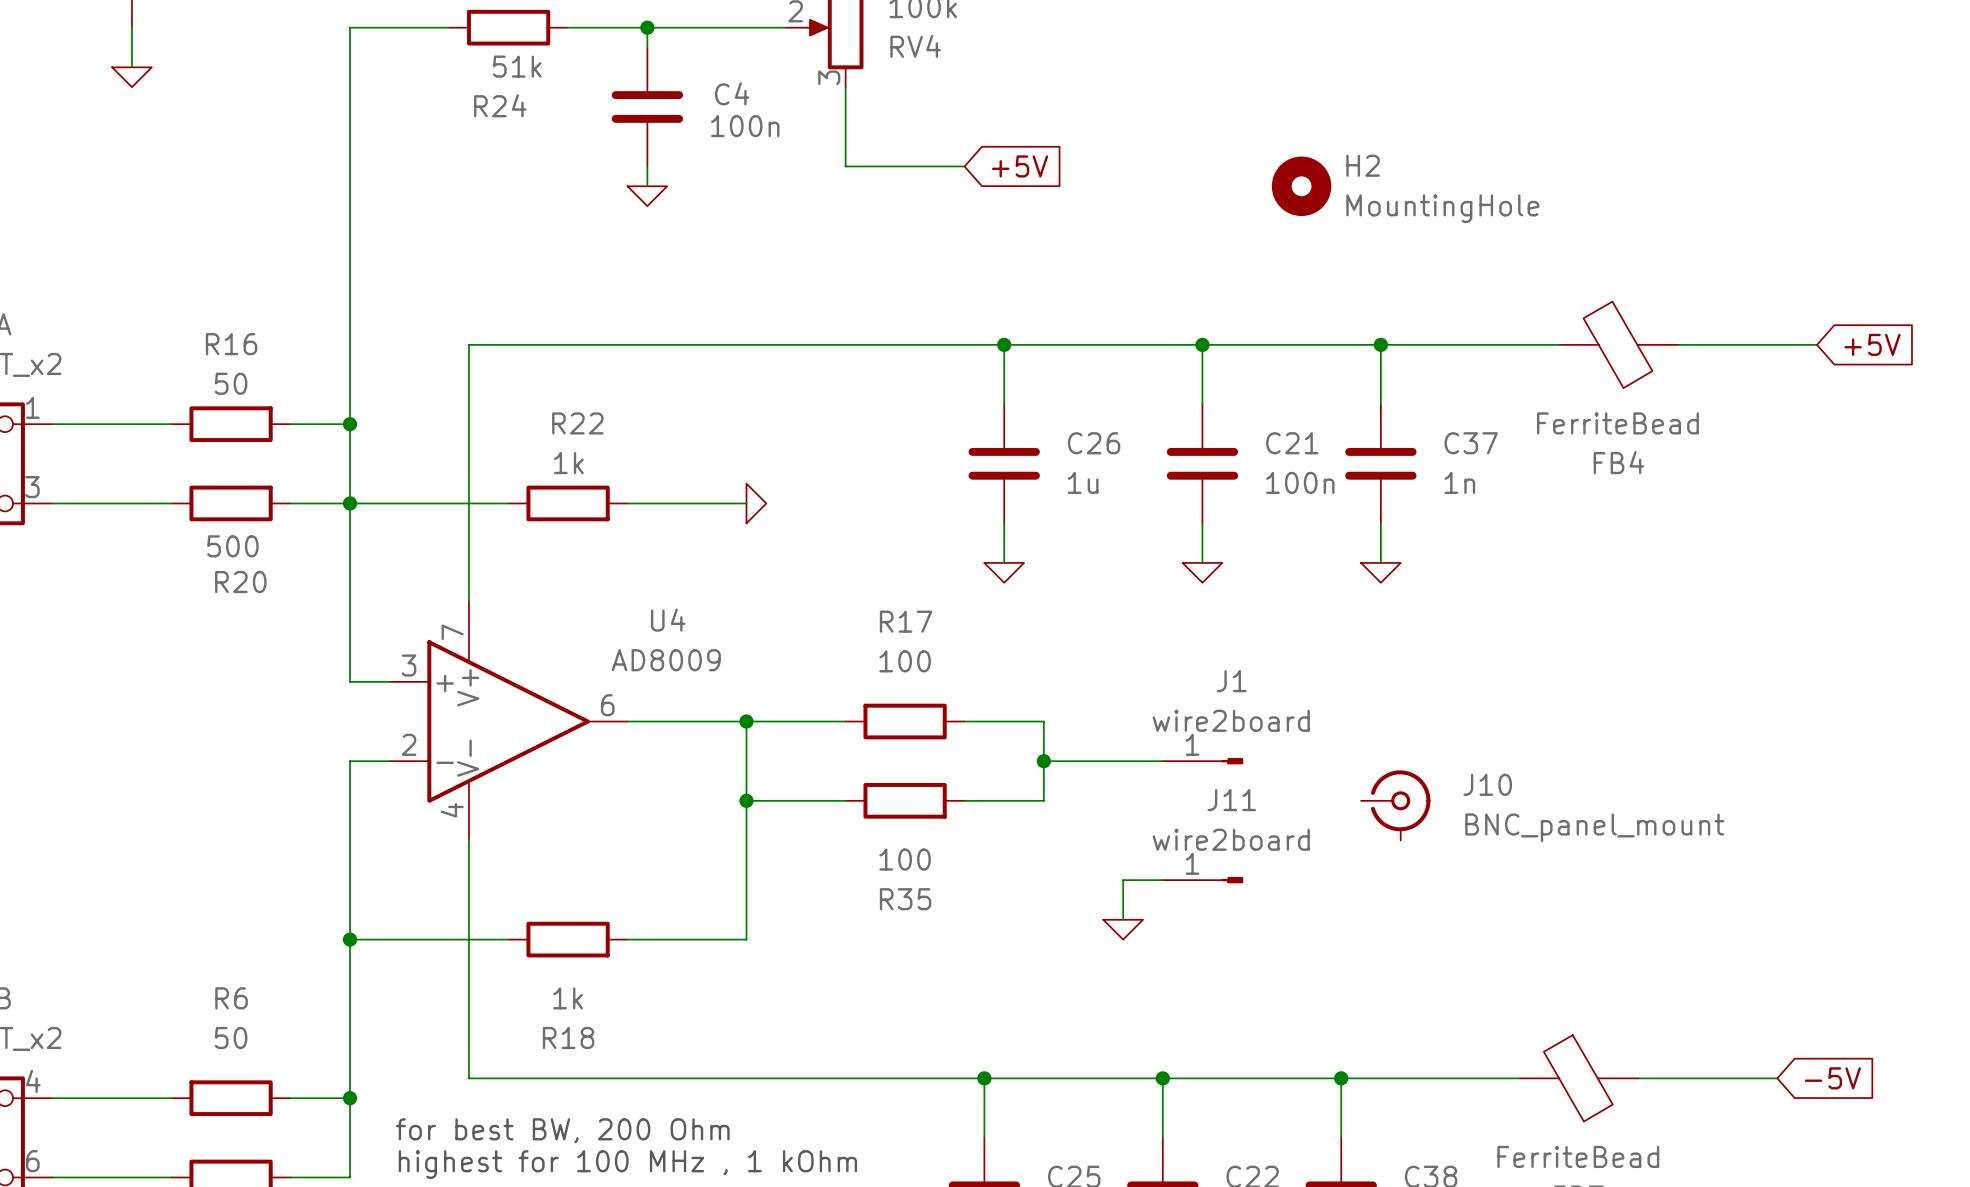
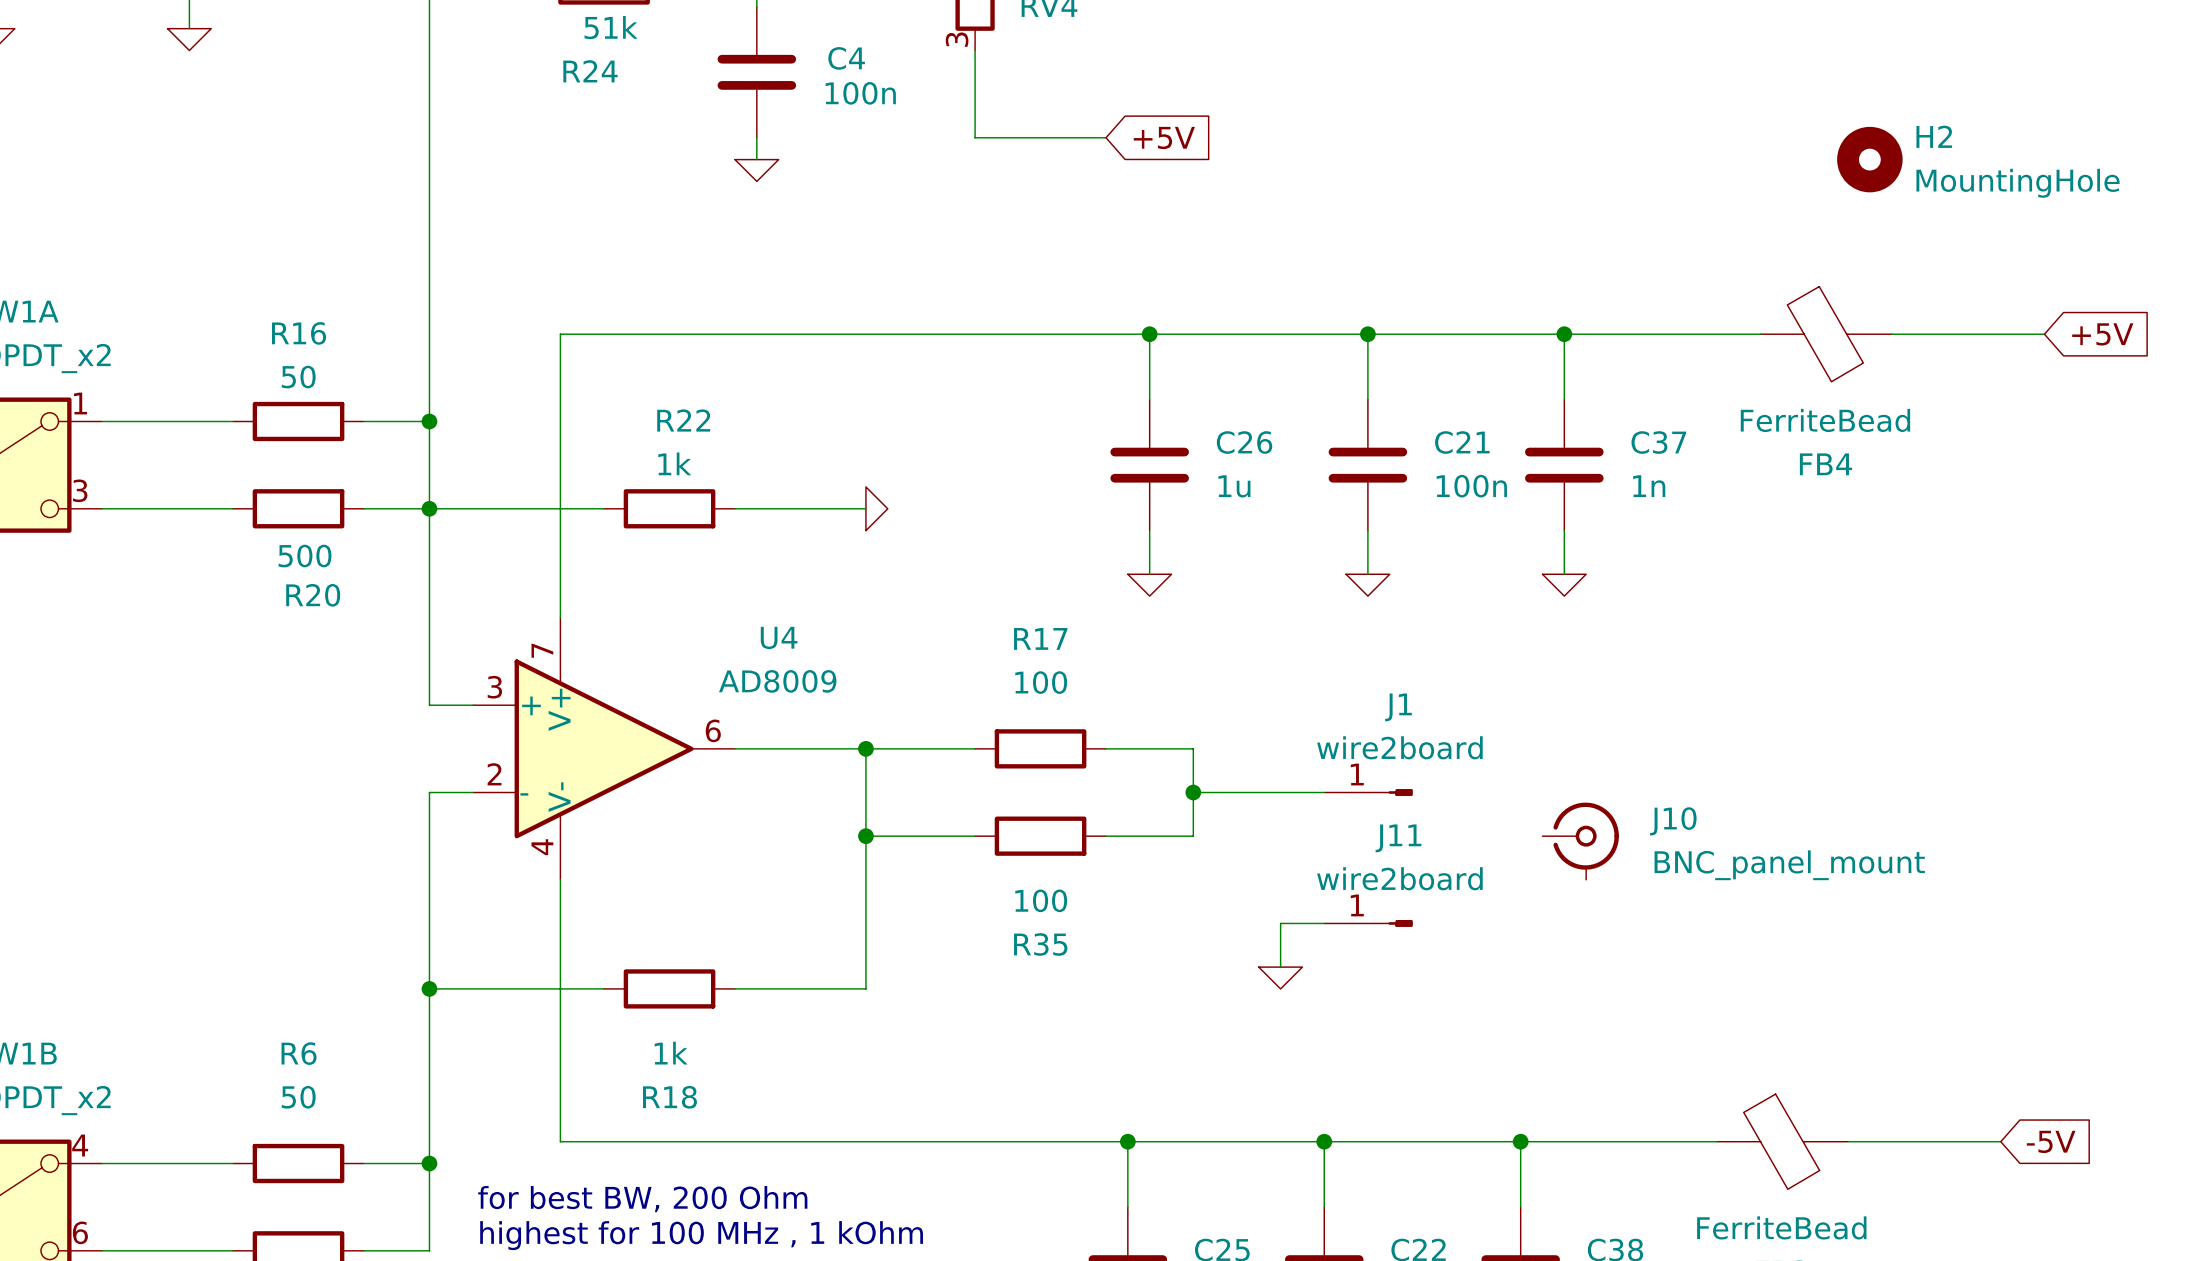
H2 position: (1301, 186) -> (1869, 159)

